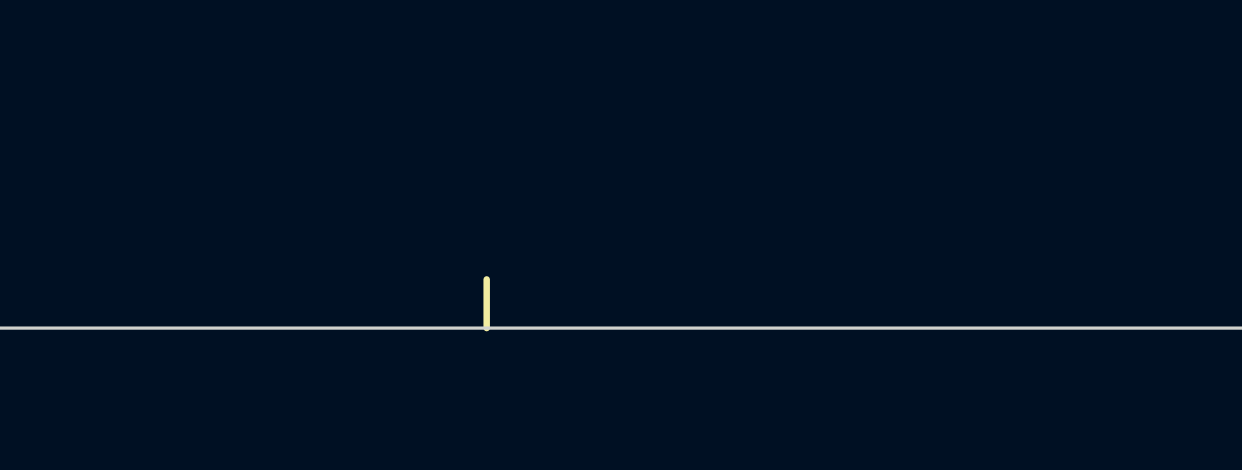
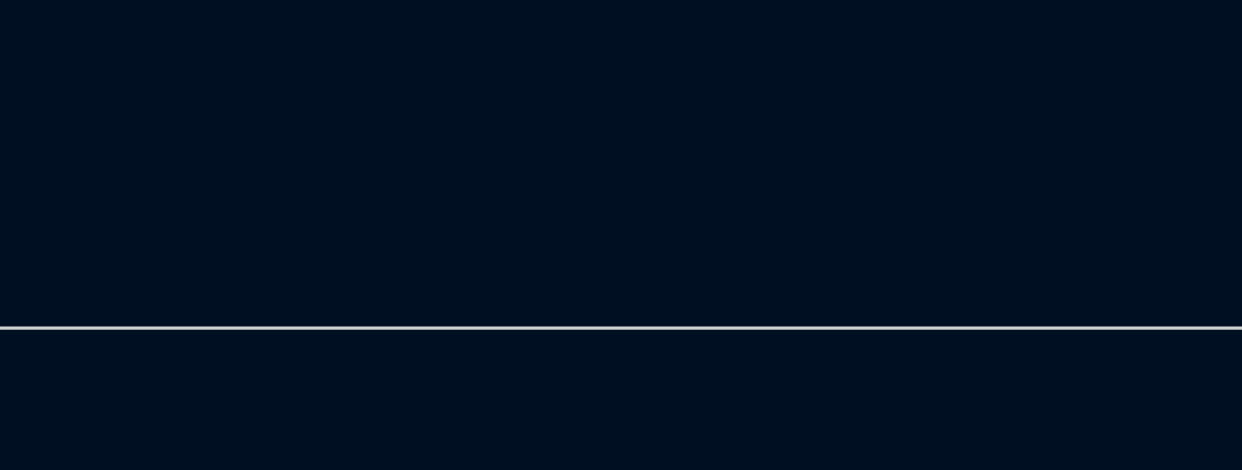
line: (486, 279) (486, 328) -> none

